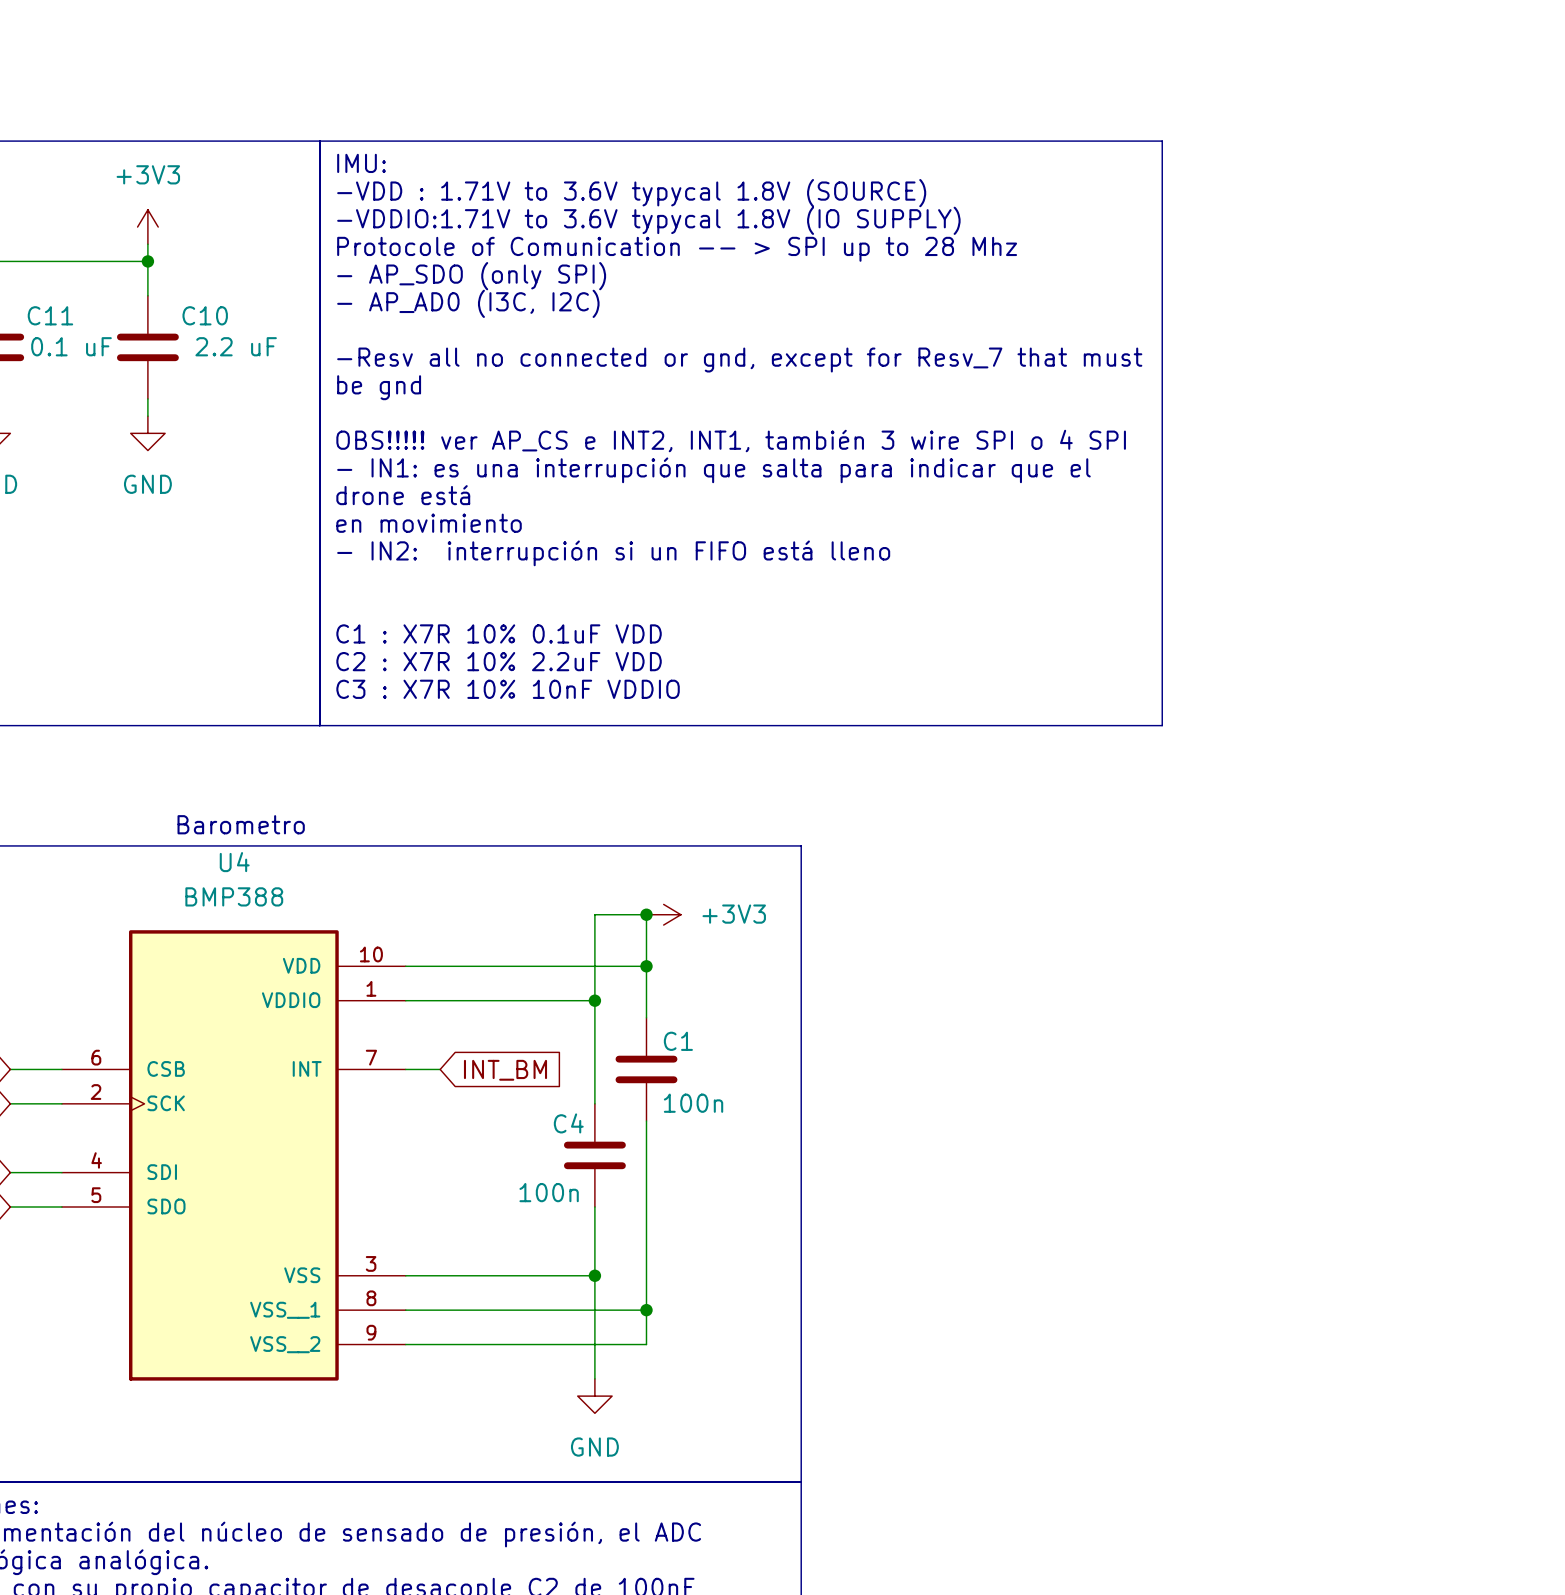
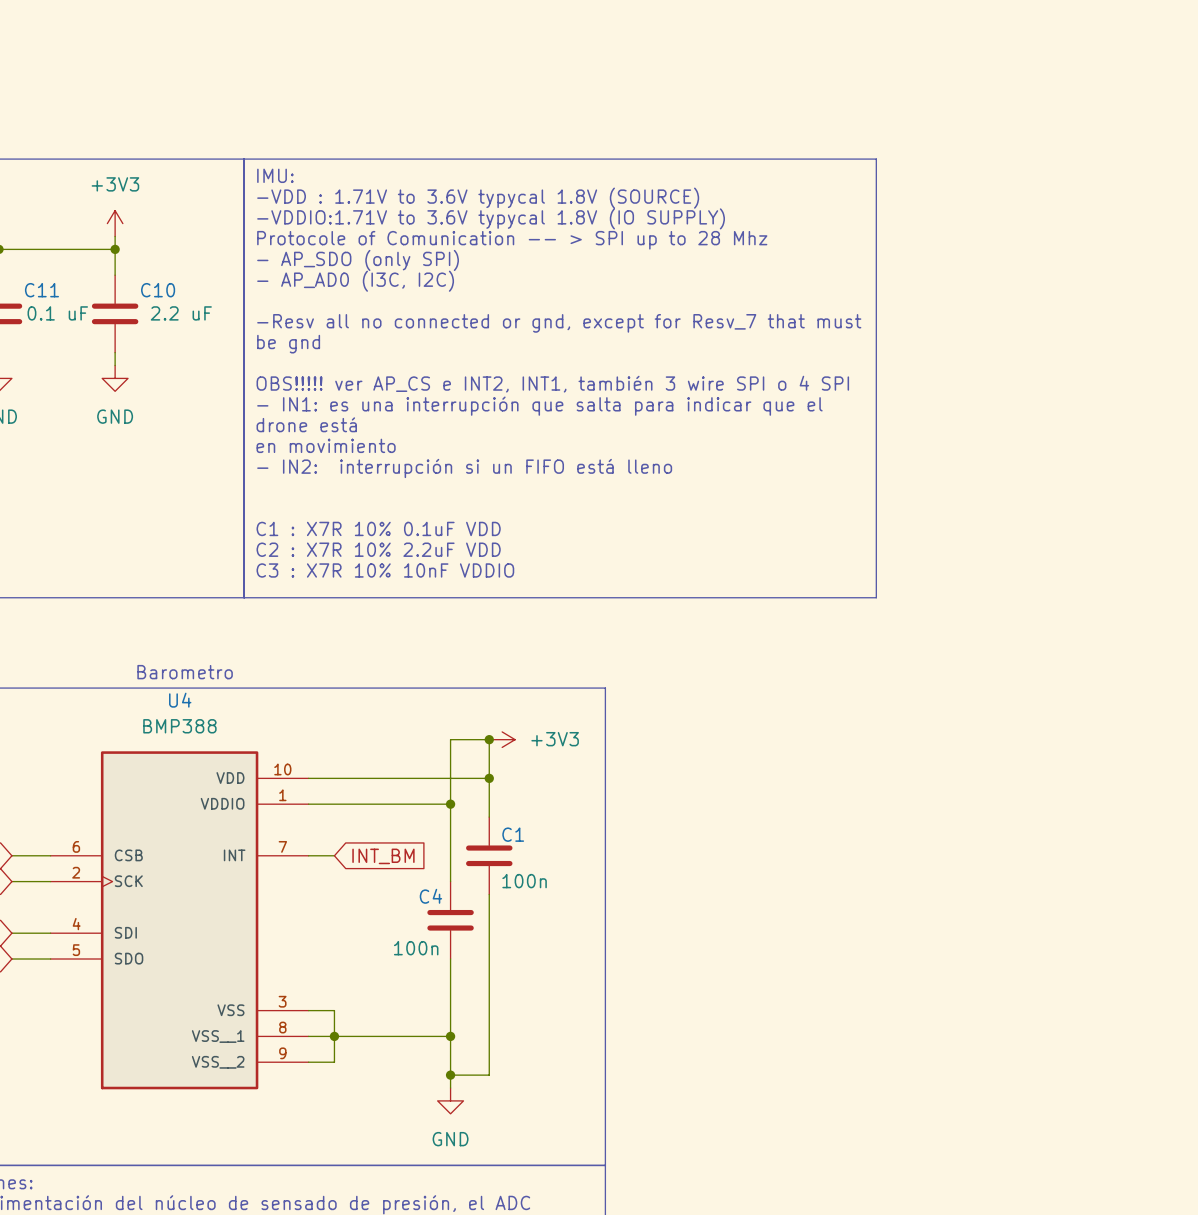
wire: (440, 1275) (594, 1275) -> (334, 1010) (334, 1062)
junction: (594, 1275) -> none
junction: none -> (334, 1036)
wire: (594, 1310) (646, 1310) -> none
junction: none -> (450, 1036)
junction: (646, 1310) -> none
wire: (440, 1344) (646, 1344) -> (450, 1075) (489, 1075) (489, 1062)
junction: none -> (450, 1075)

